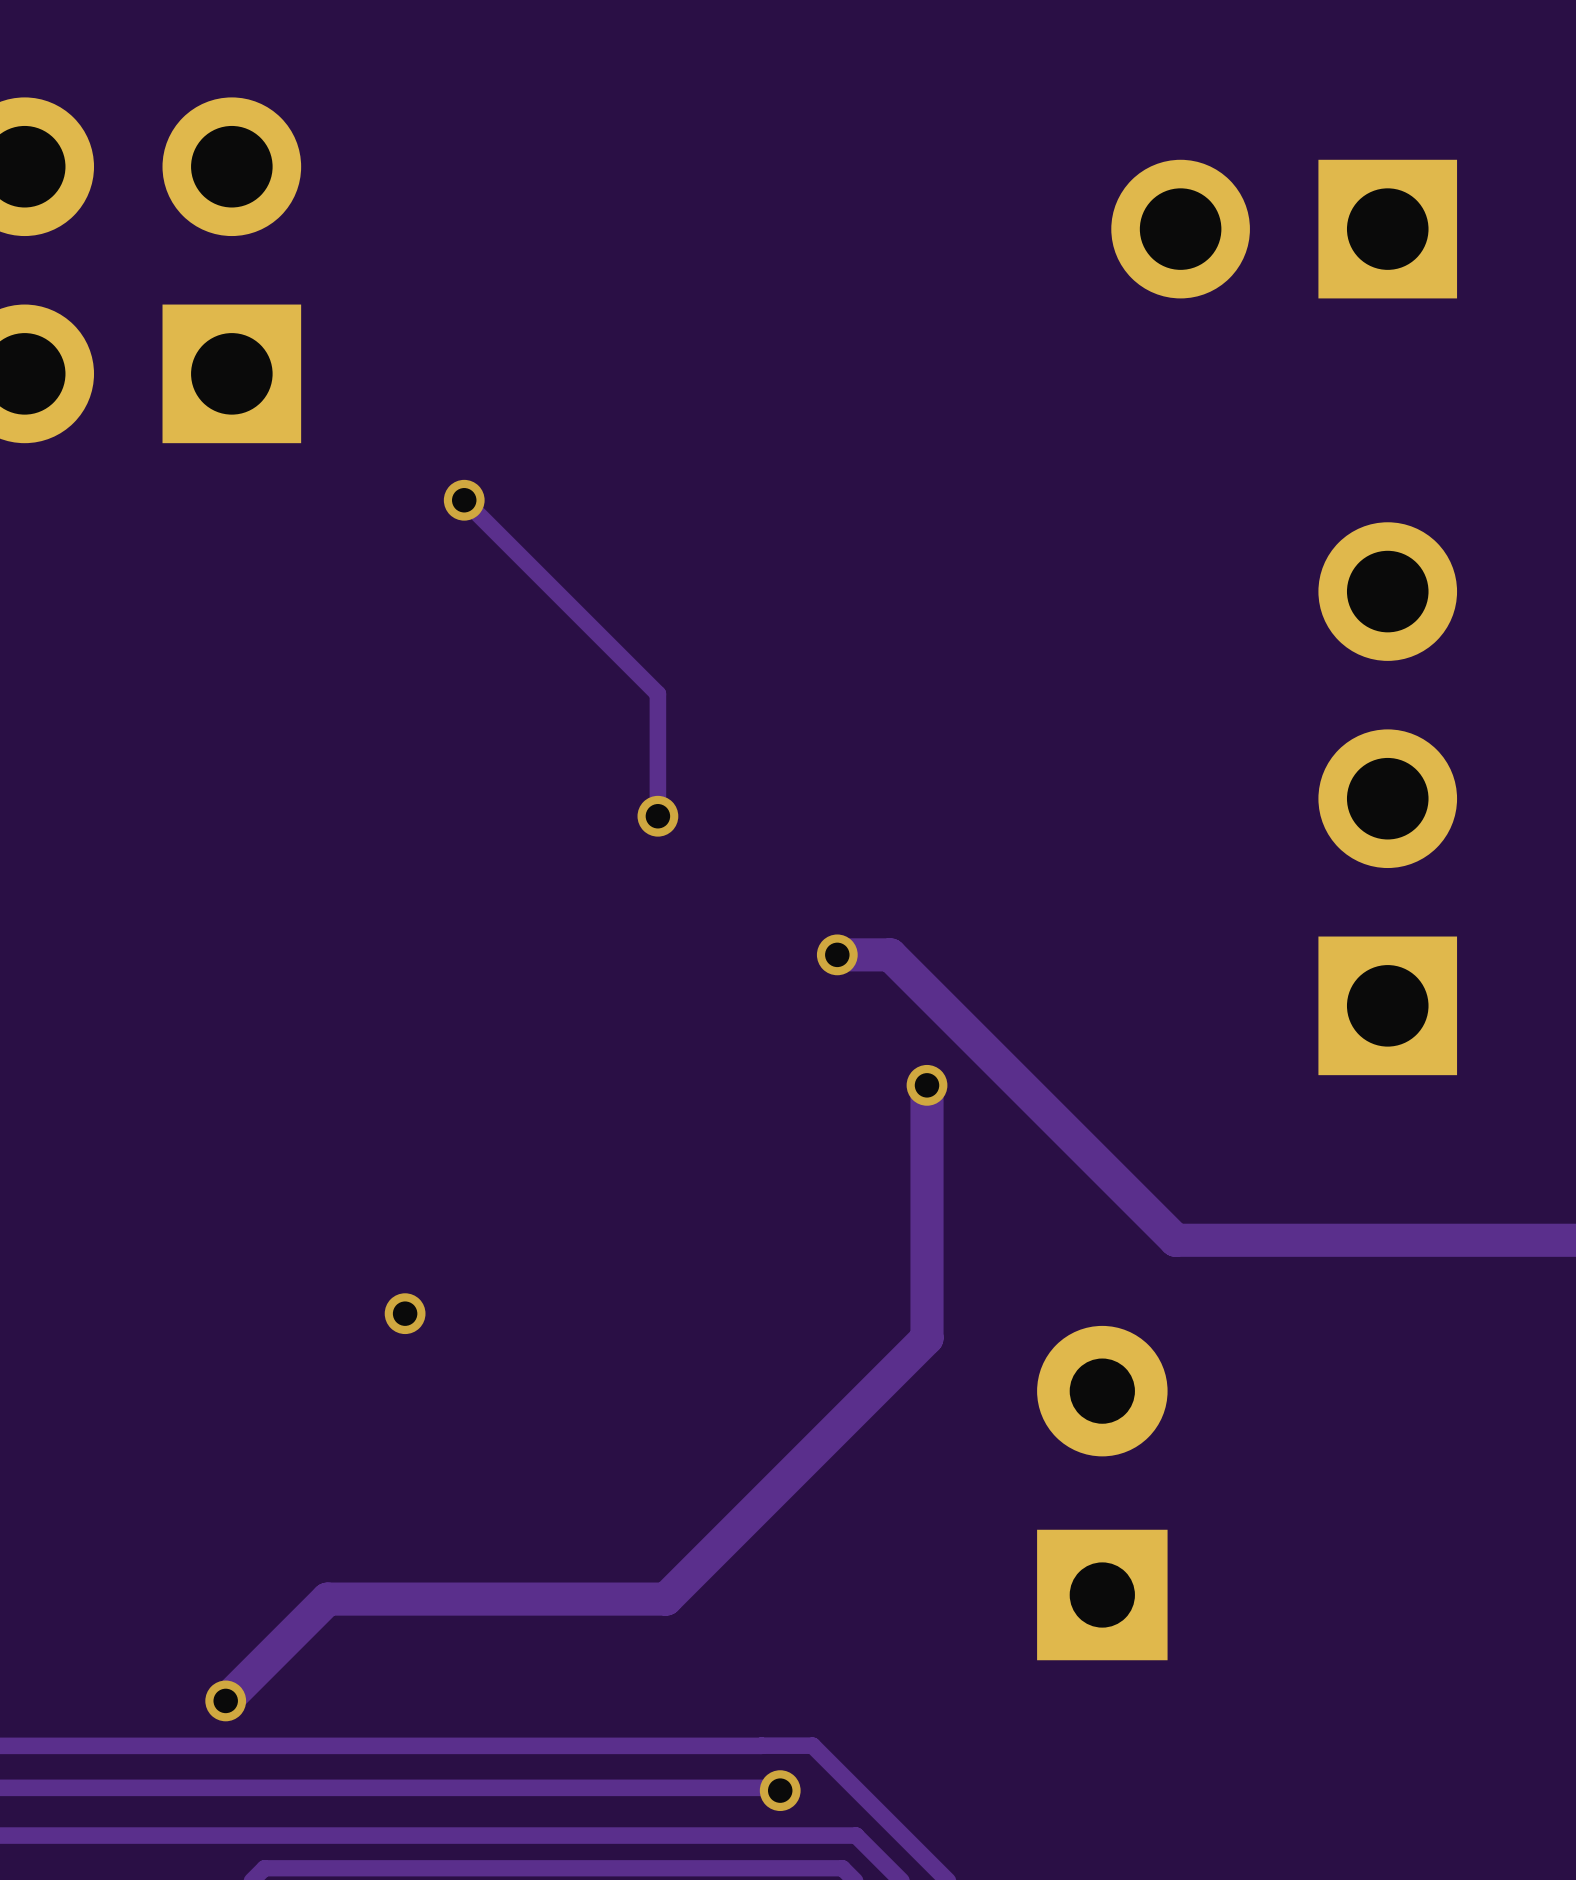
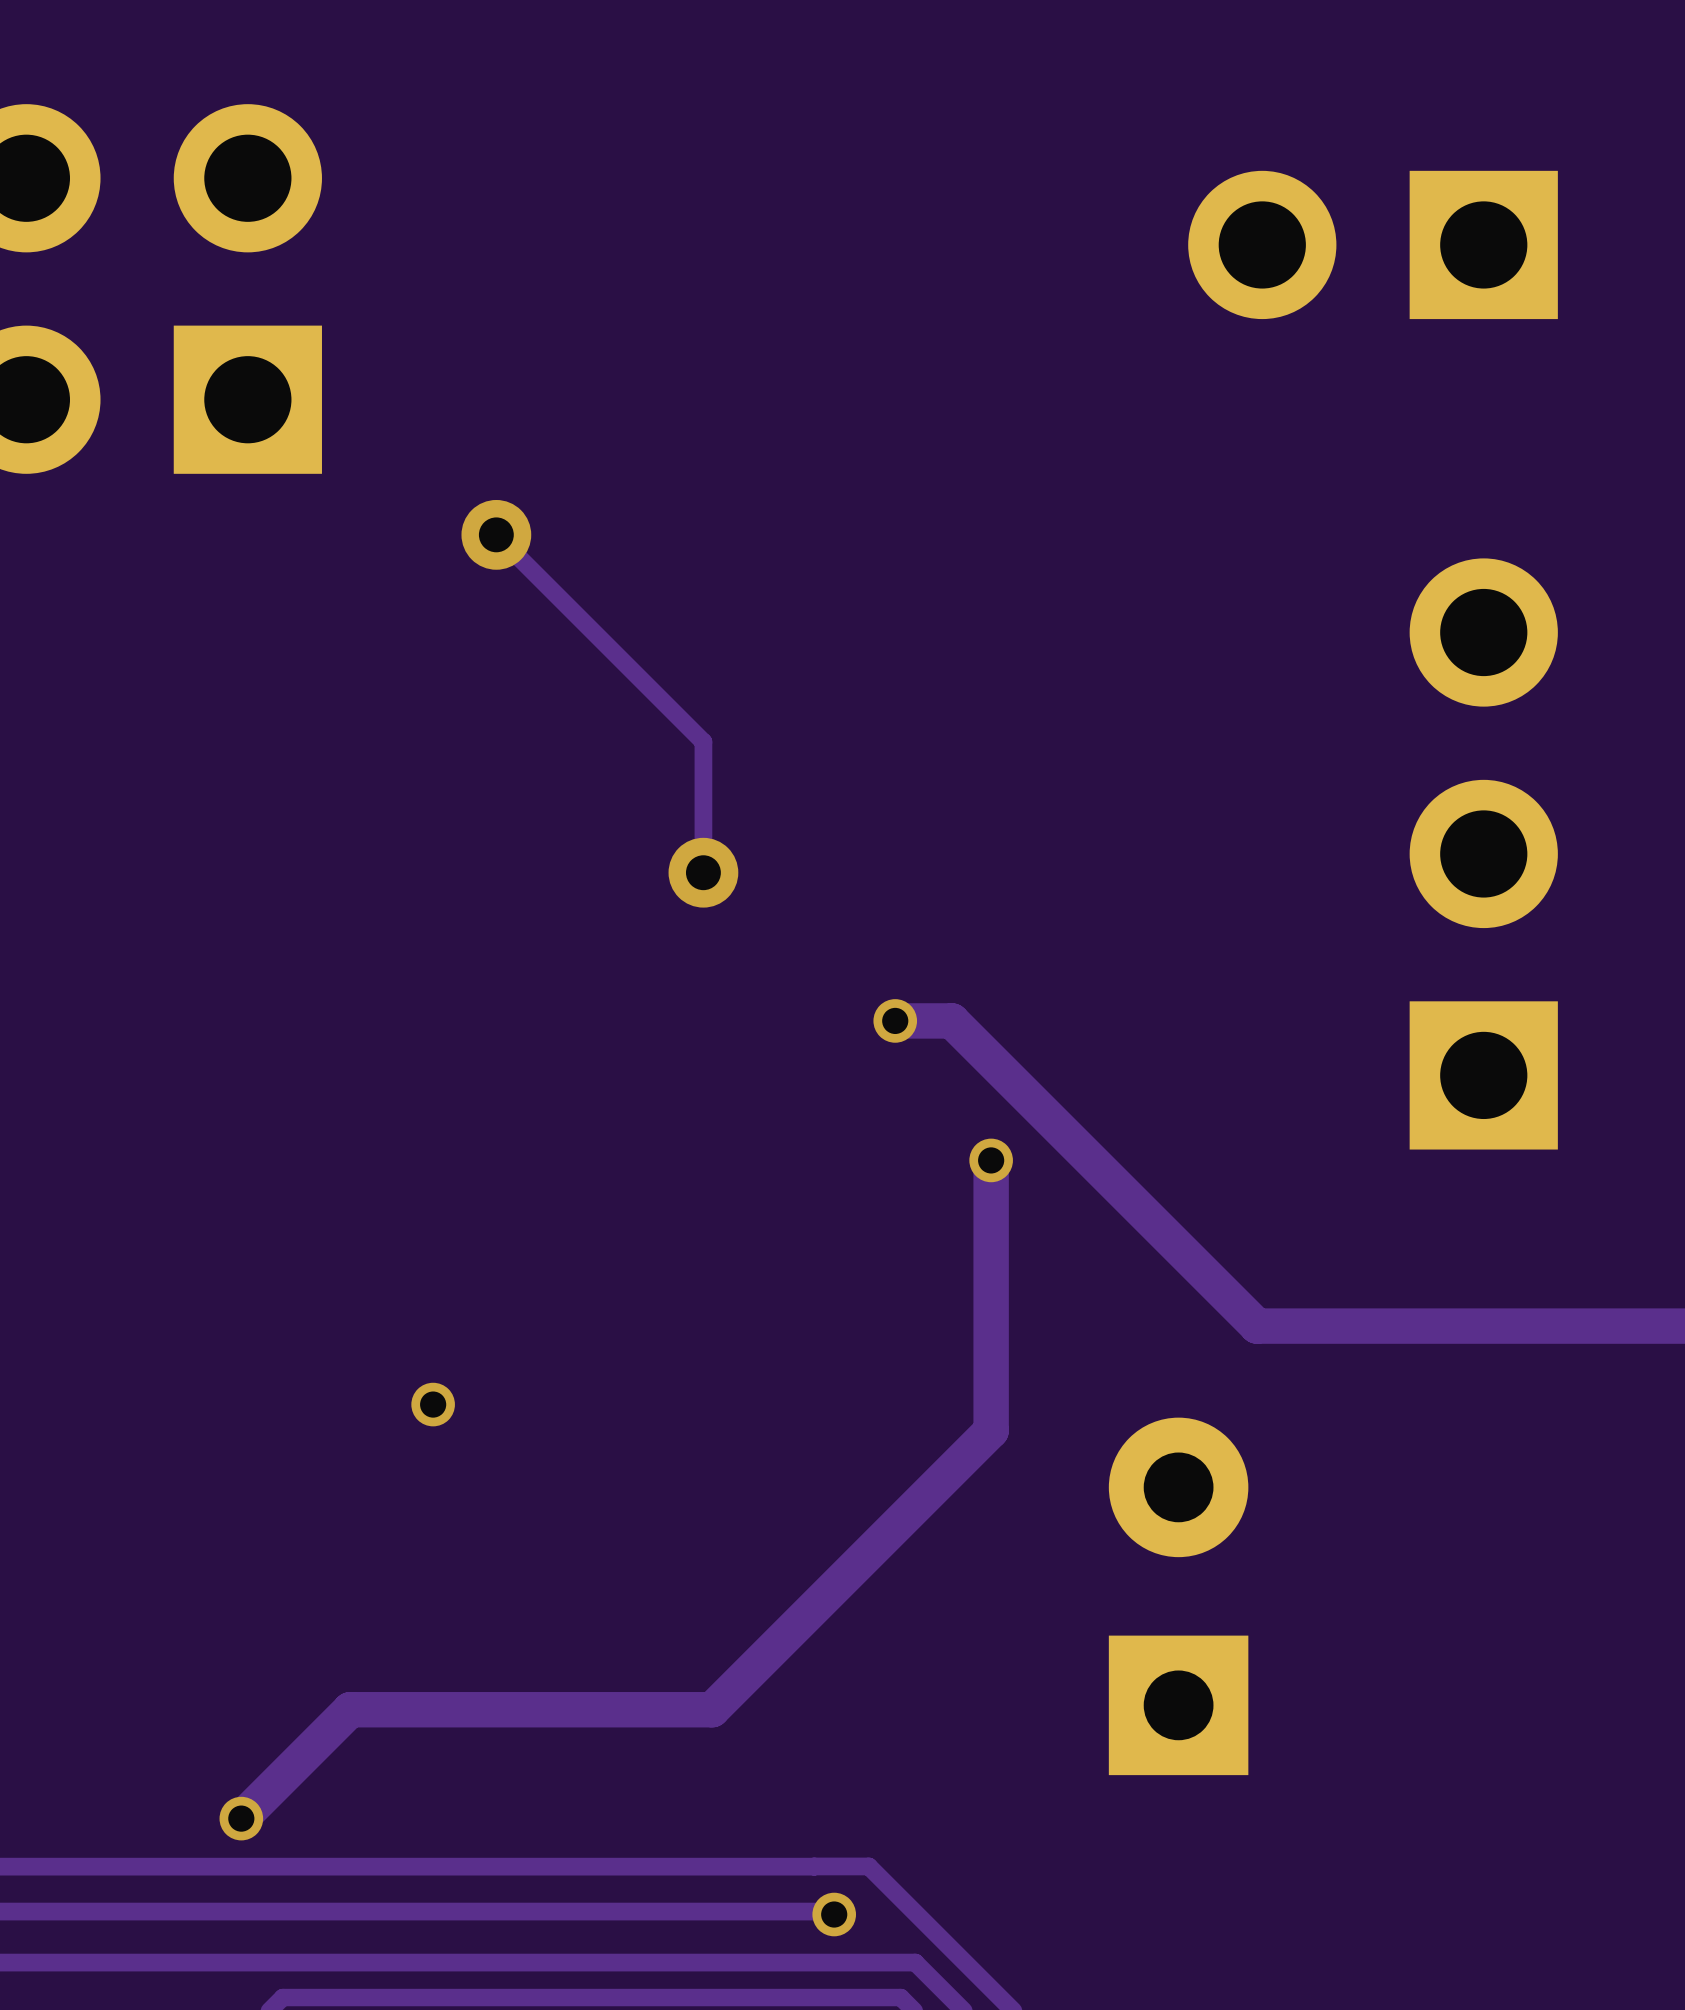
via size: [443, 479, 485, 521] -> [461, 499, 532, 570]
via size: [637, 795, 679, 837] -> [668, 837, 739, 908]

